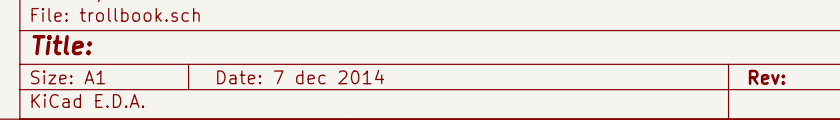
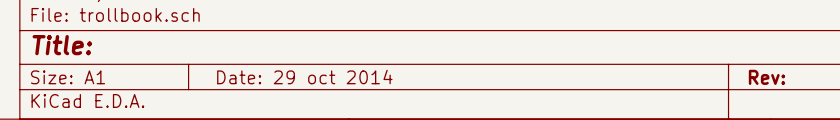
title block: Date: 7 dec 2014 (300, 77) -> Date: 29 oct 2014 (304, 77)

